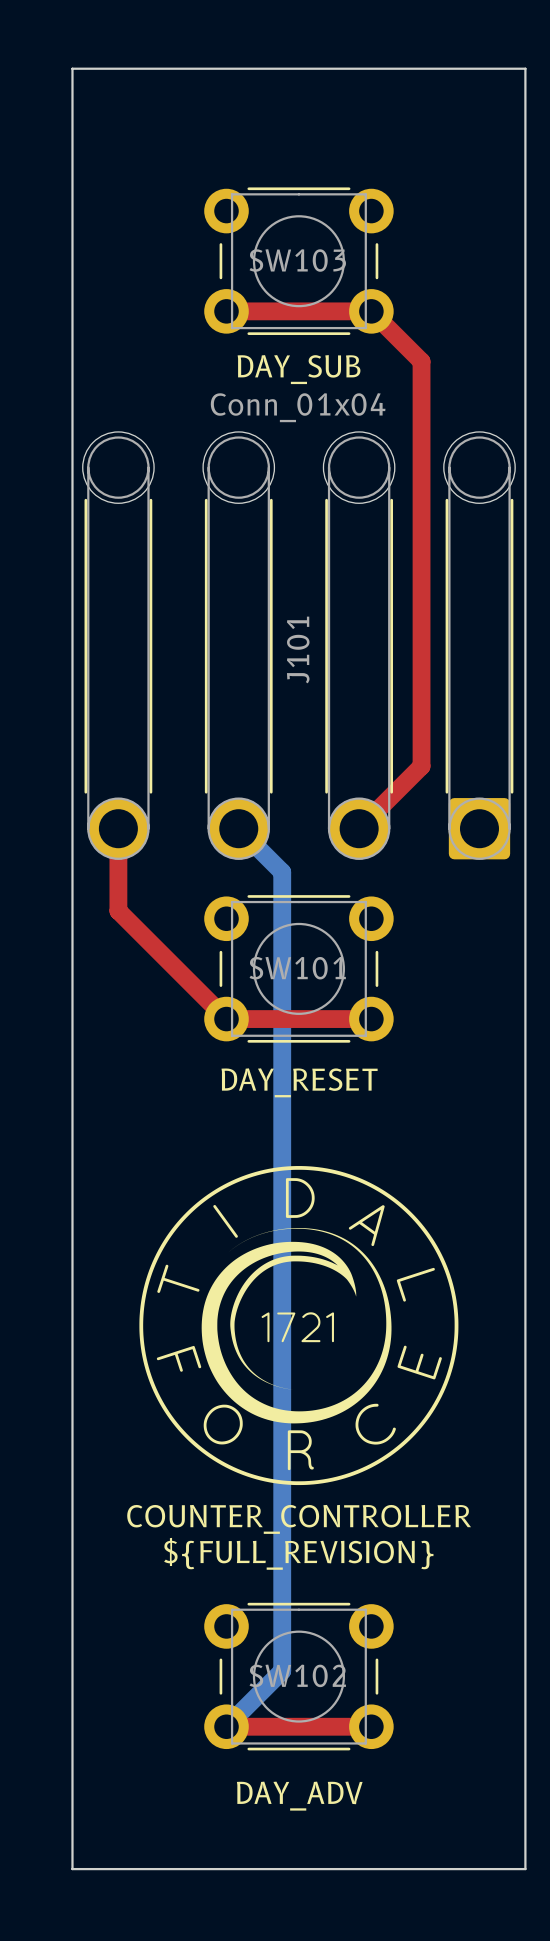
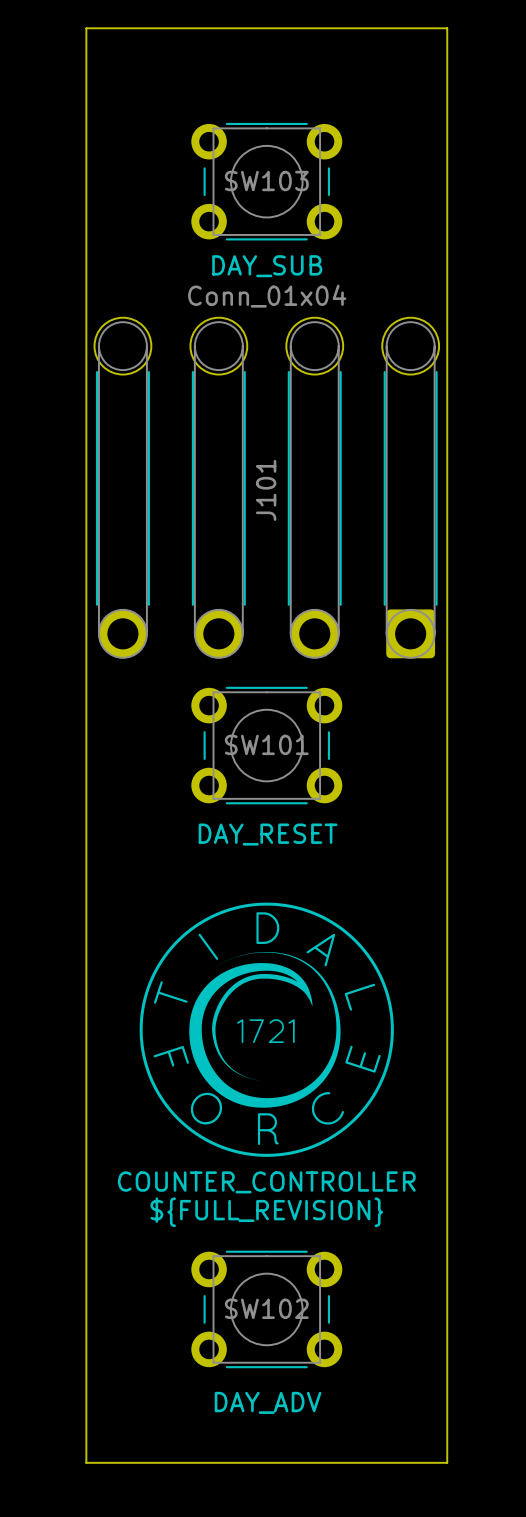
top track: (226, 311) (371, 311) (421, 361) (421, 766) (359, 828) -> none
top track: (118, 828) (118, 910) (226, 1019) (371, 1019) -> none
bottom track: (238, 828) (282, 872) (282, 1671) (226, 1726) -> none
top track: (226, 1726) (371, 1726) -> none

